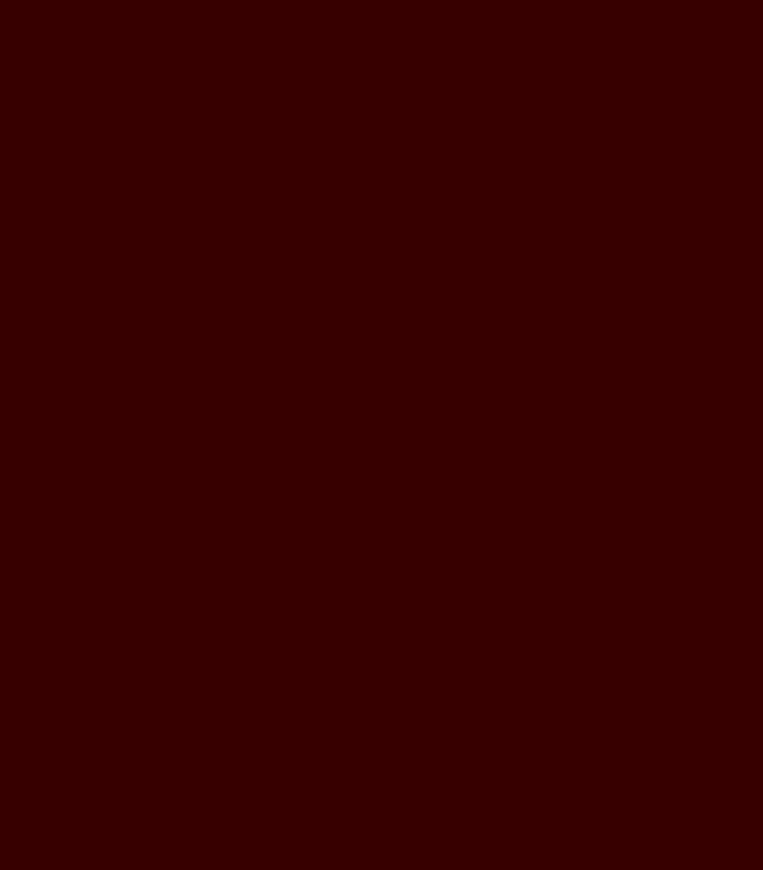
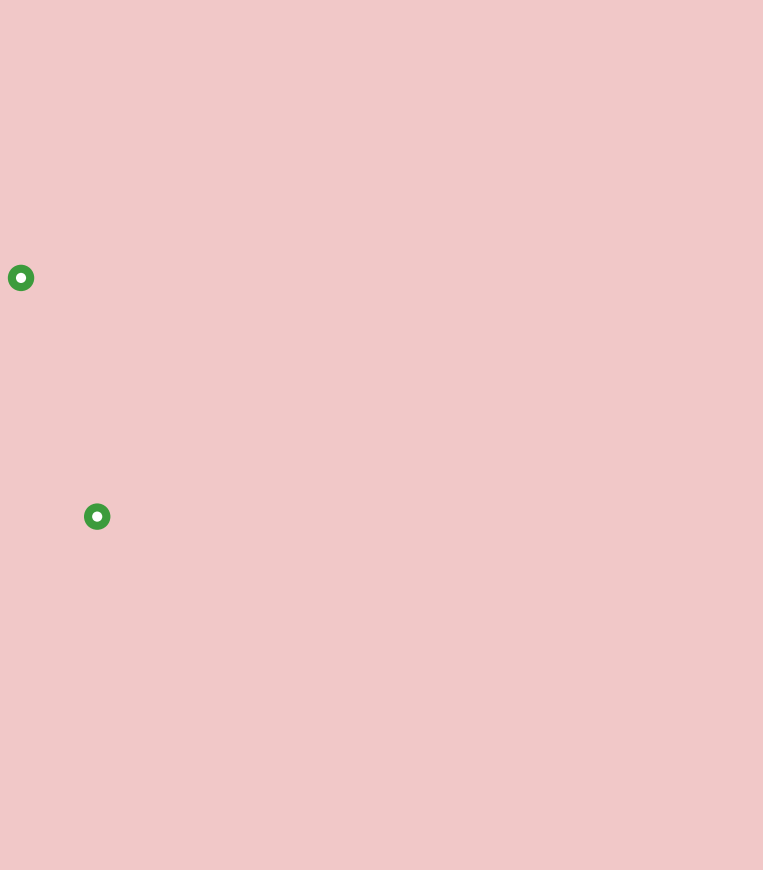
via: none -> (21, 277)
via: none -> (97, 516)

